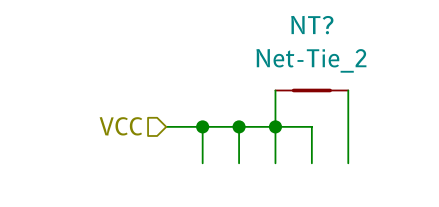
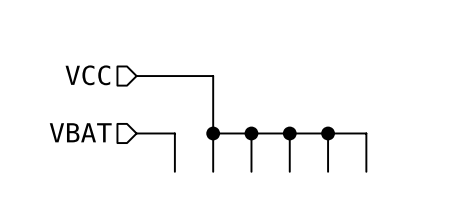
wire: (275, 90) (275, 126) -> none
NT?: Net-Tie_2 (311, 90) -> none
wire: (348, 90) (348, 126) -> (328, 133) (366, 133)
hierarchical label: none -> VBAT (80, 132)
hierarchical label position: VCC (120, 126) -> VCC (87, 75)
wire: none -> (136, 133) (174, 133) (174, 171)
wire: (166, 126) (202, 126) -> (136, 76) (213, 76) (213, 133)
junction: none -> (328, 133)

